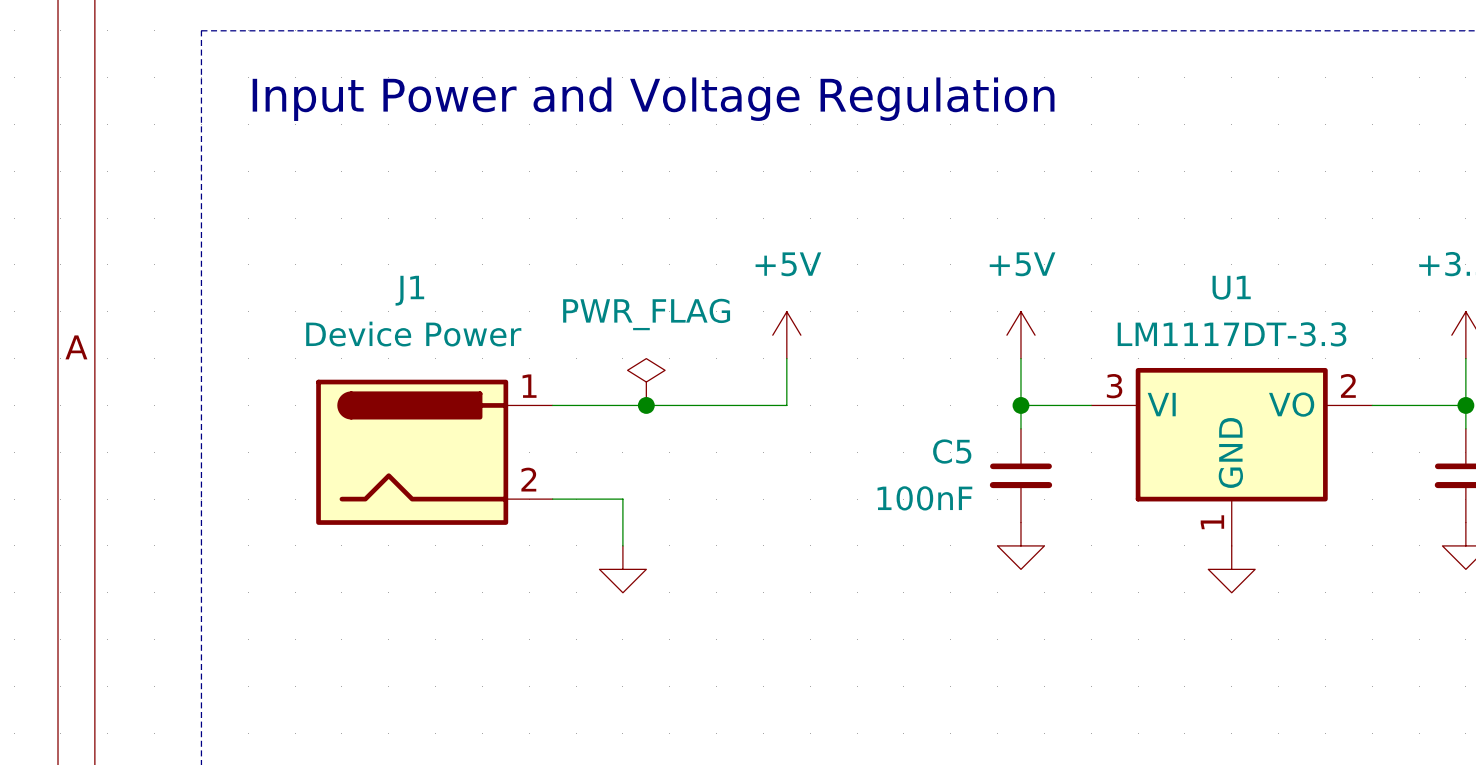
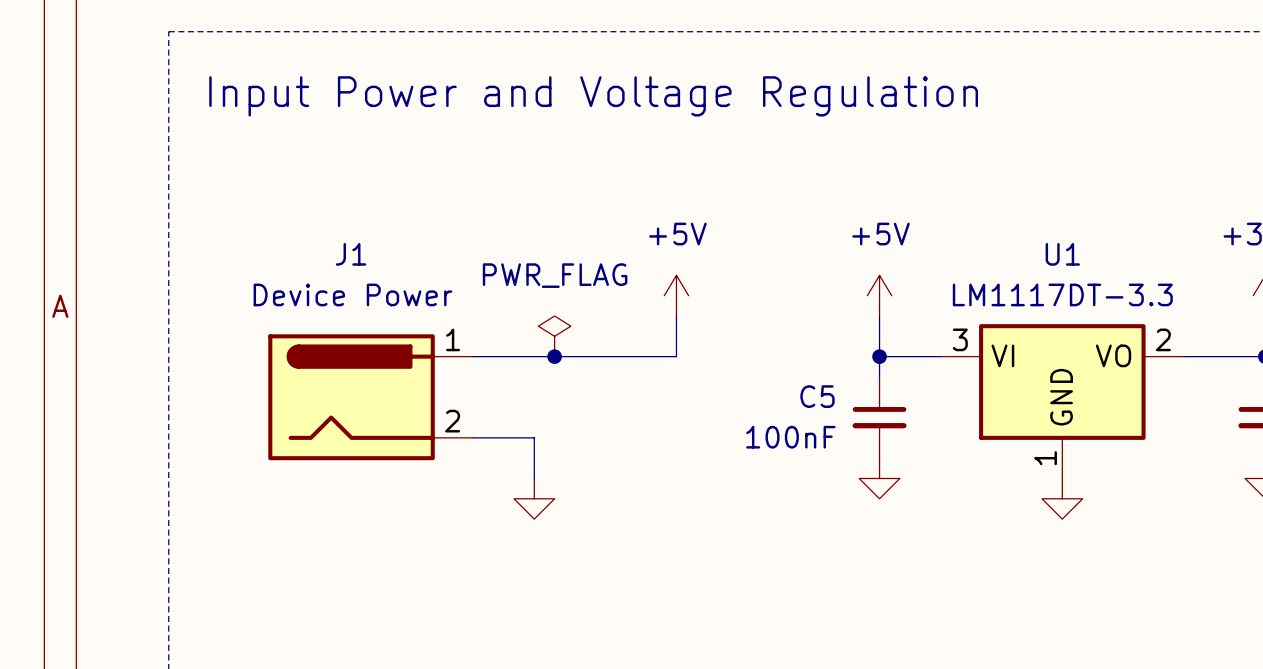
text: Input Power and Voltage Regulation (653, 99) -> none
text: none -> Input Power and Voltage Regulation (593, 96)

